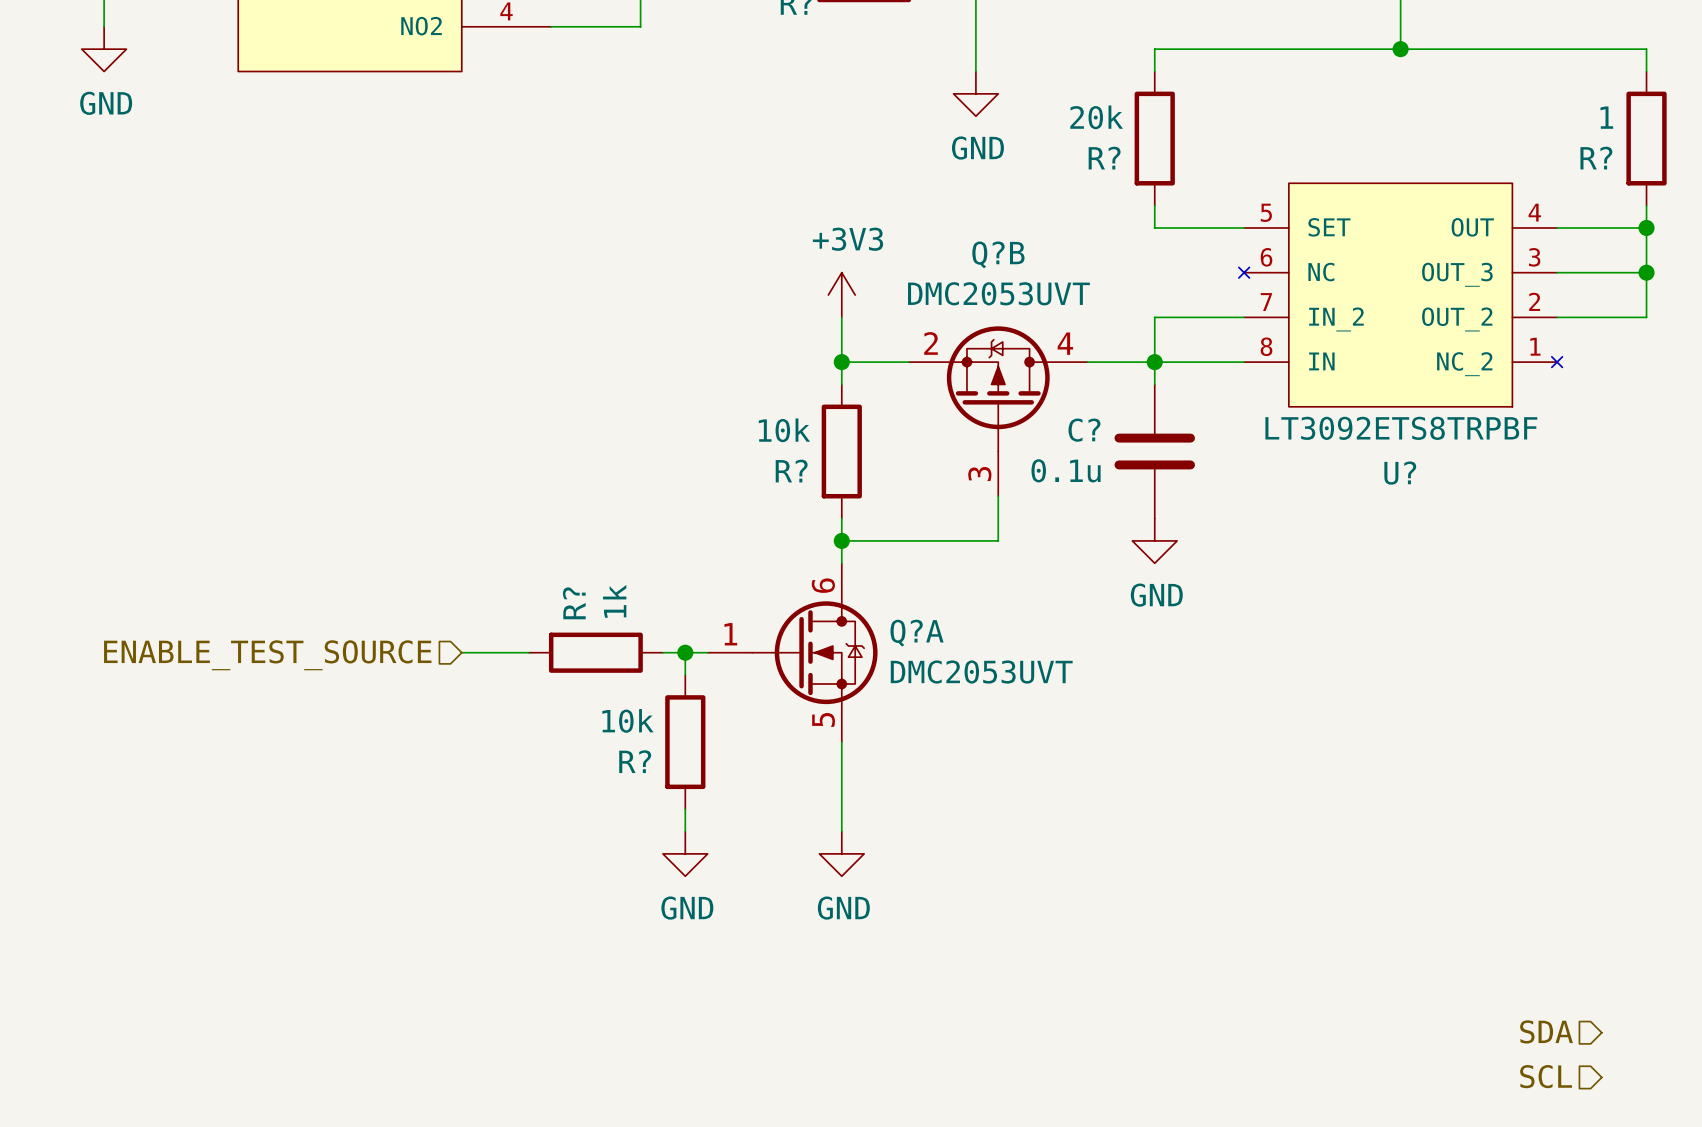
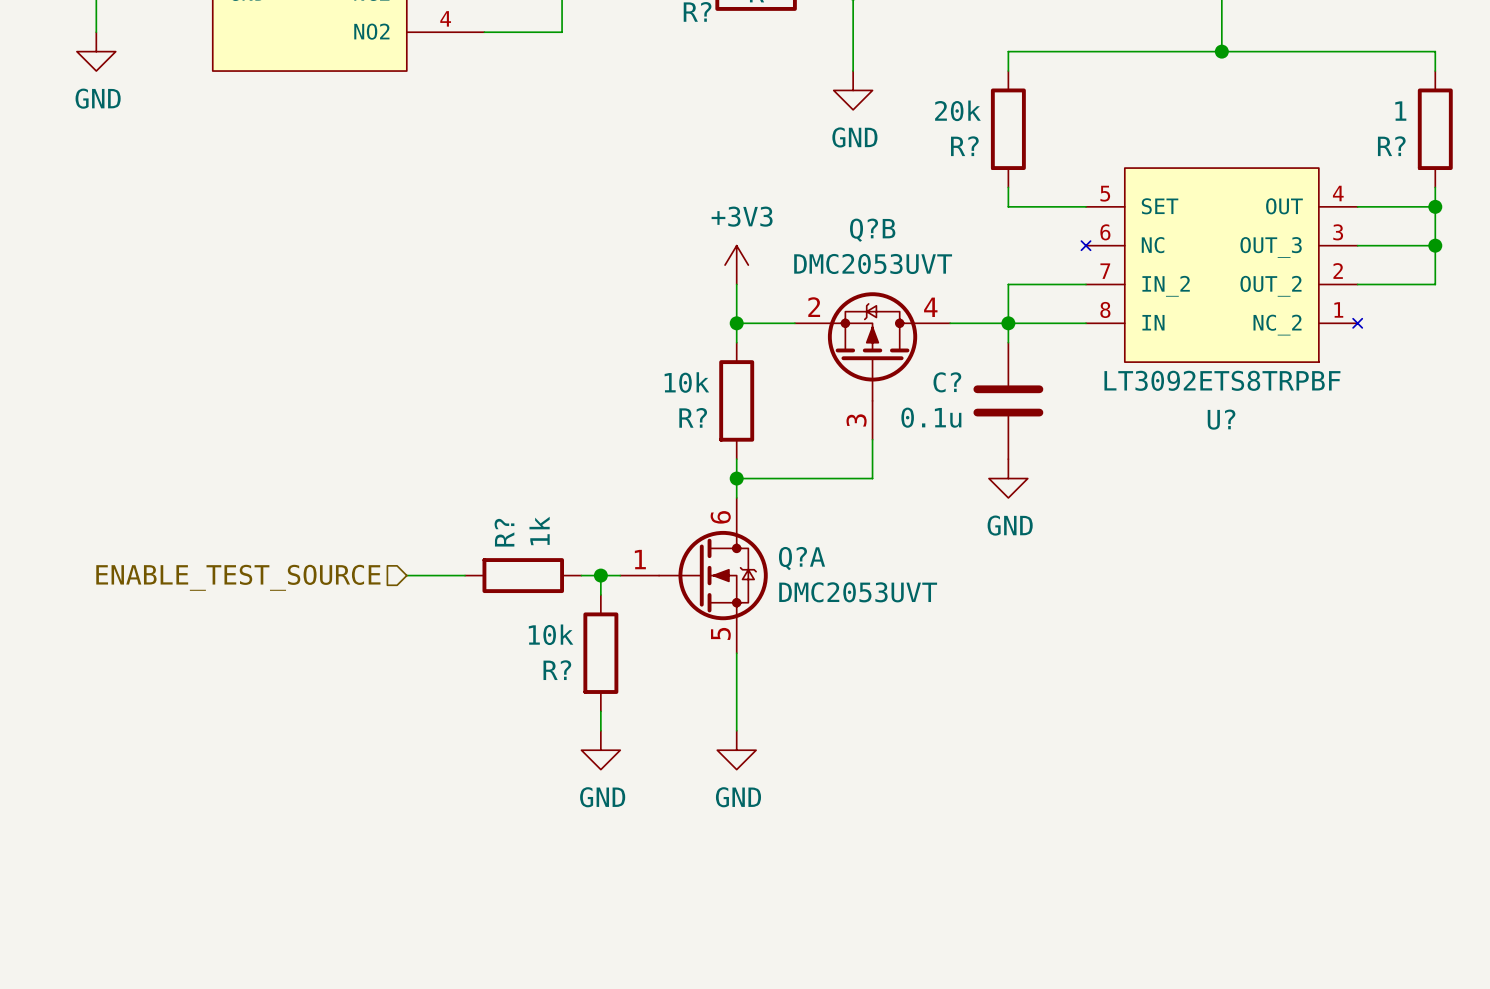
hierarchical label: SDA (1546, 1031) -> none
hierarchical label: SCL (1546, 1076) -> none

